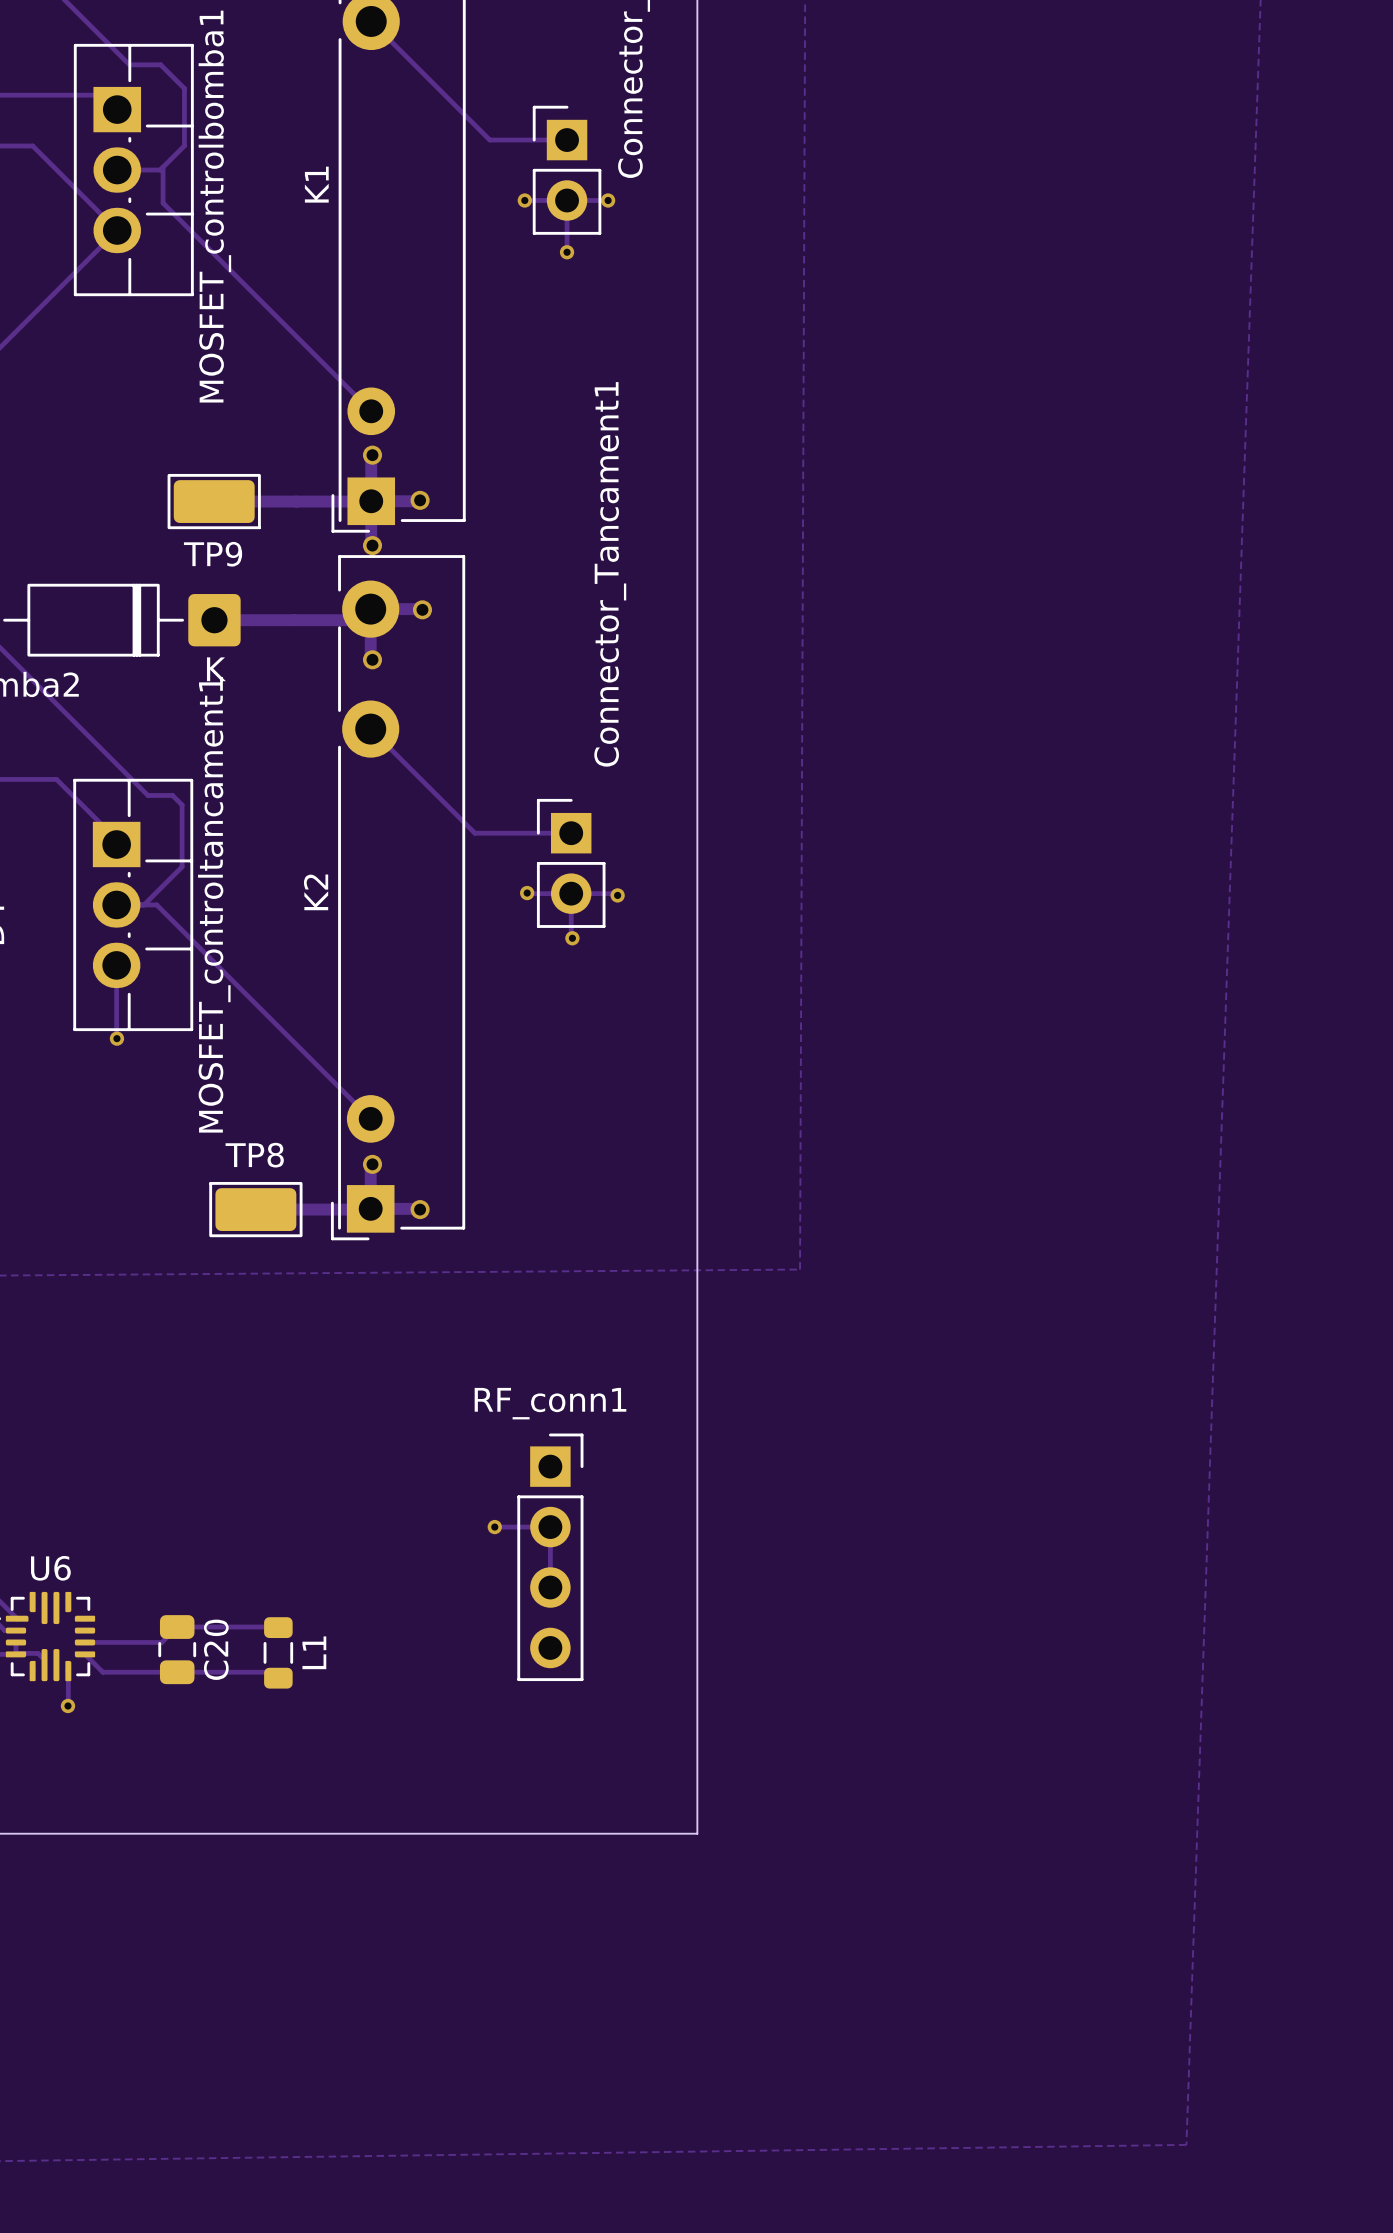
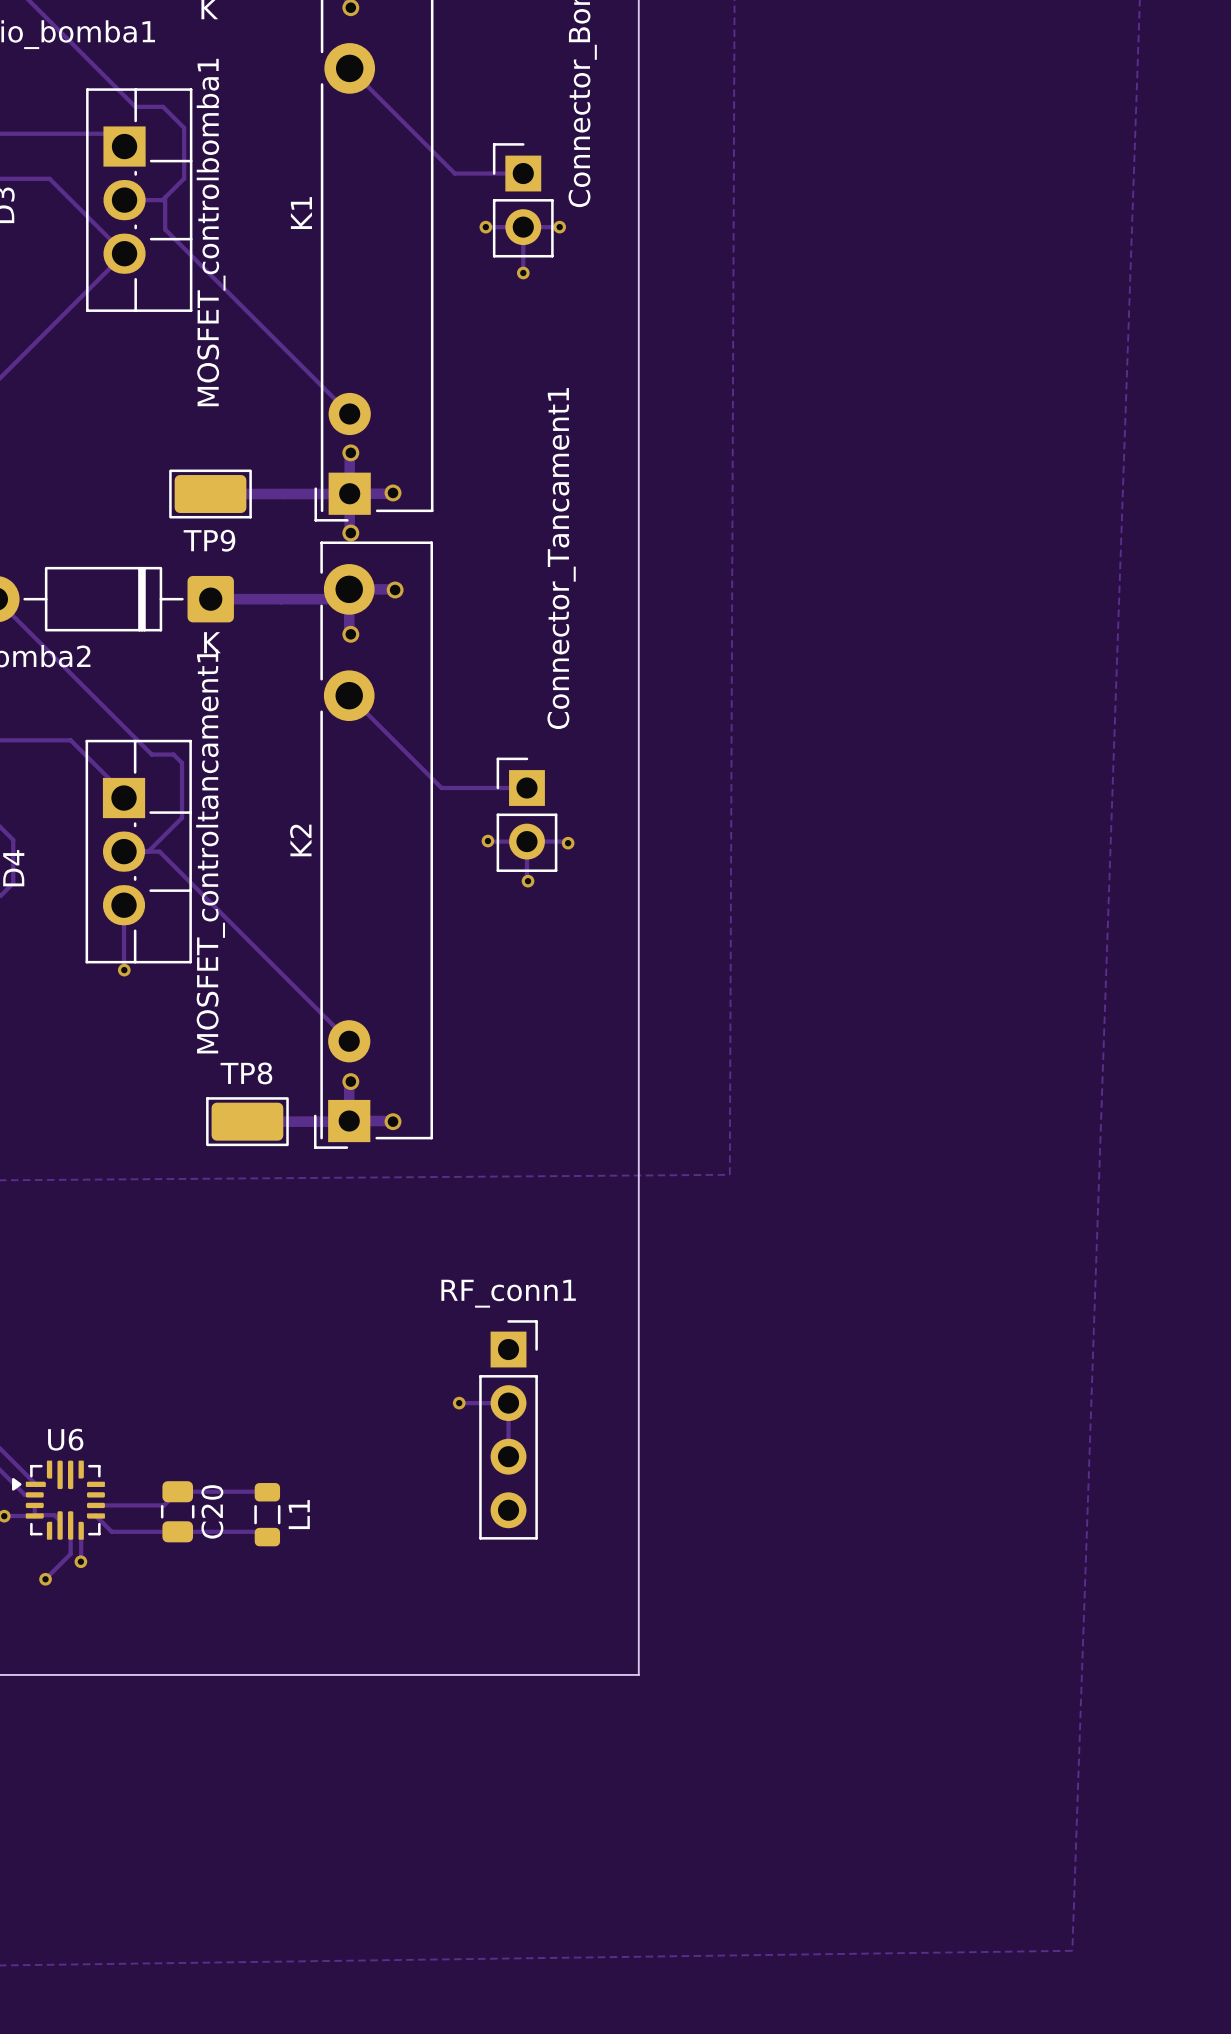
track: none -> (70, 1525) (70, 1554) (45, 1579)
via: none -> (45, 1579)

